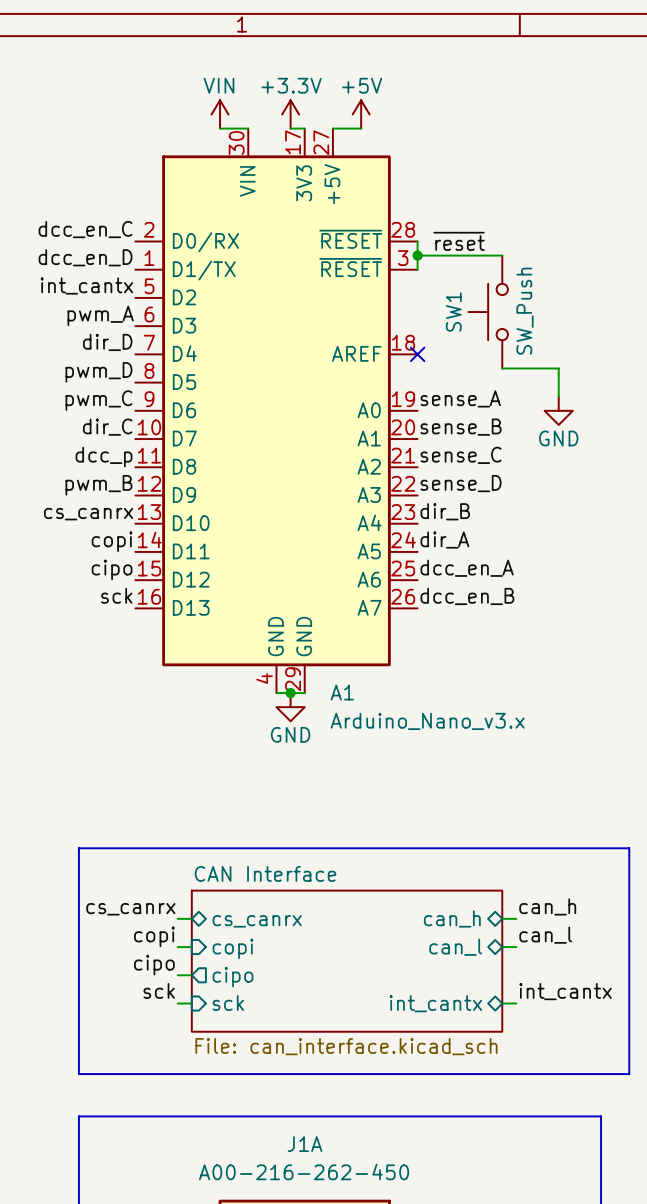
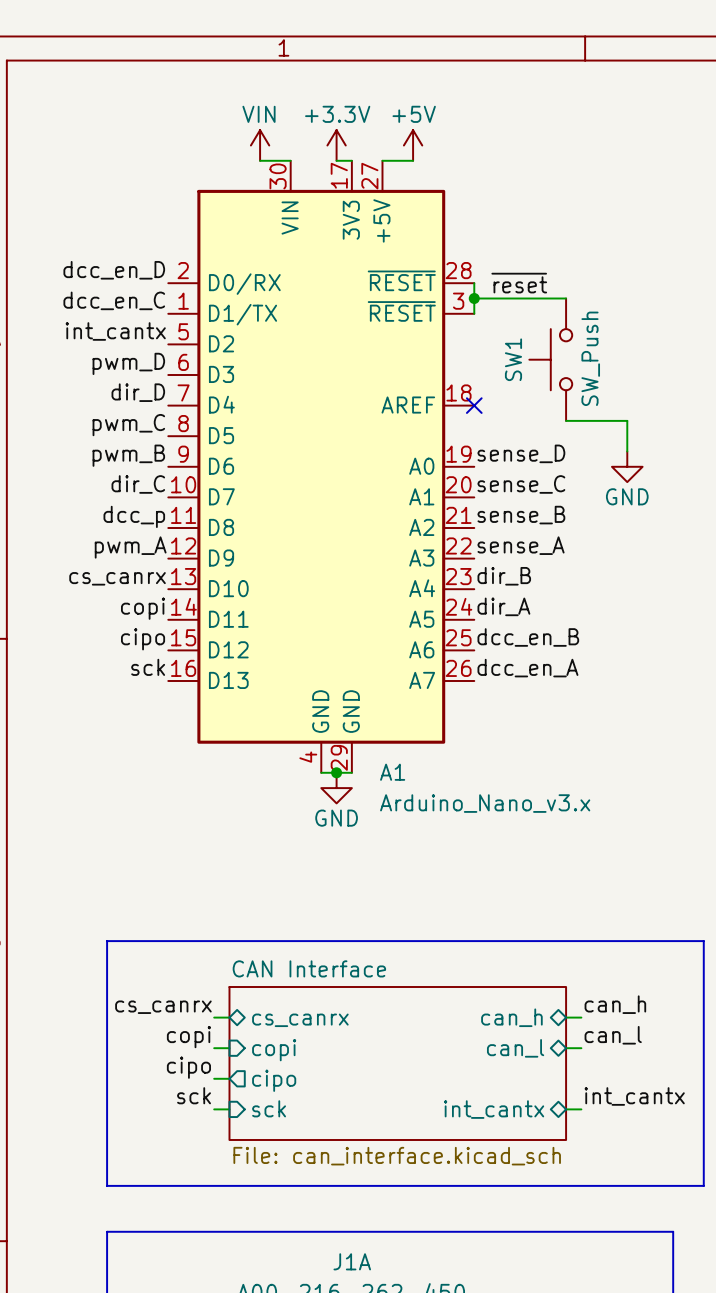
label: dcc_en_C (85, 229) -> dcc_en_D (114, 270)
label: dcc_en_D (85, 257) -> dcc_en_C (114, 300)
label: pwm_A (100, 315) -> pwm_D (128, 363)
label: pwm_D (98, 372) -> pwm_C (128, 425)
label: sense_A (460, 398) -> sense_D (521, 453)
label: pwm_C (98, 400) -> pwm_B (128, 455)
label: sense_B (461, 427) -> sense_C (521, 484)
label: sense_C (461, 455) -> sense_B (521, 515)
label: sense_D (461, 483) -> sense_A (521, 545)
label: pwm_B (98, 485) -> pwm_A (130, 547)
label: dcc_en_A (467, 568) -> dcc_en_B (528, 637)
label: dcc_en_B (467, 596) -> dcc_en_A (527, 668)

